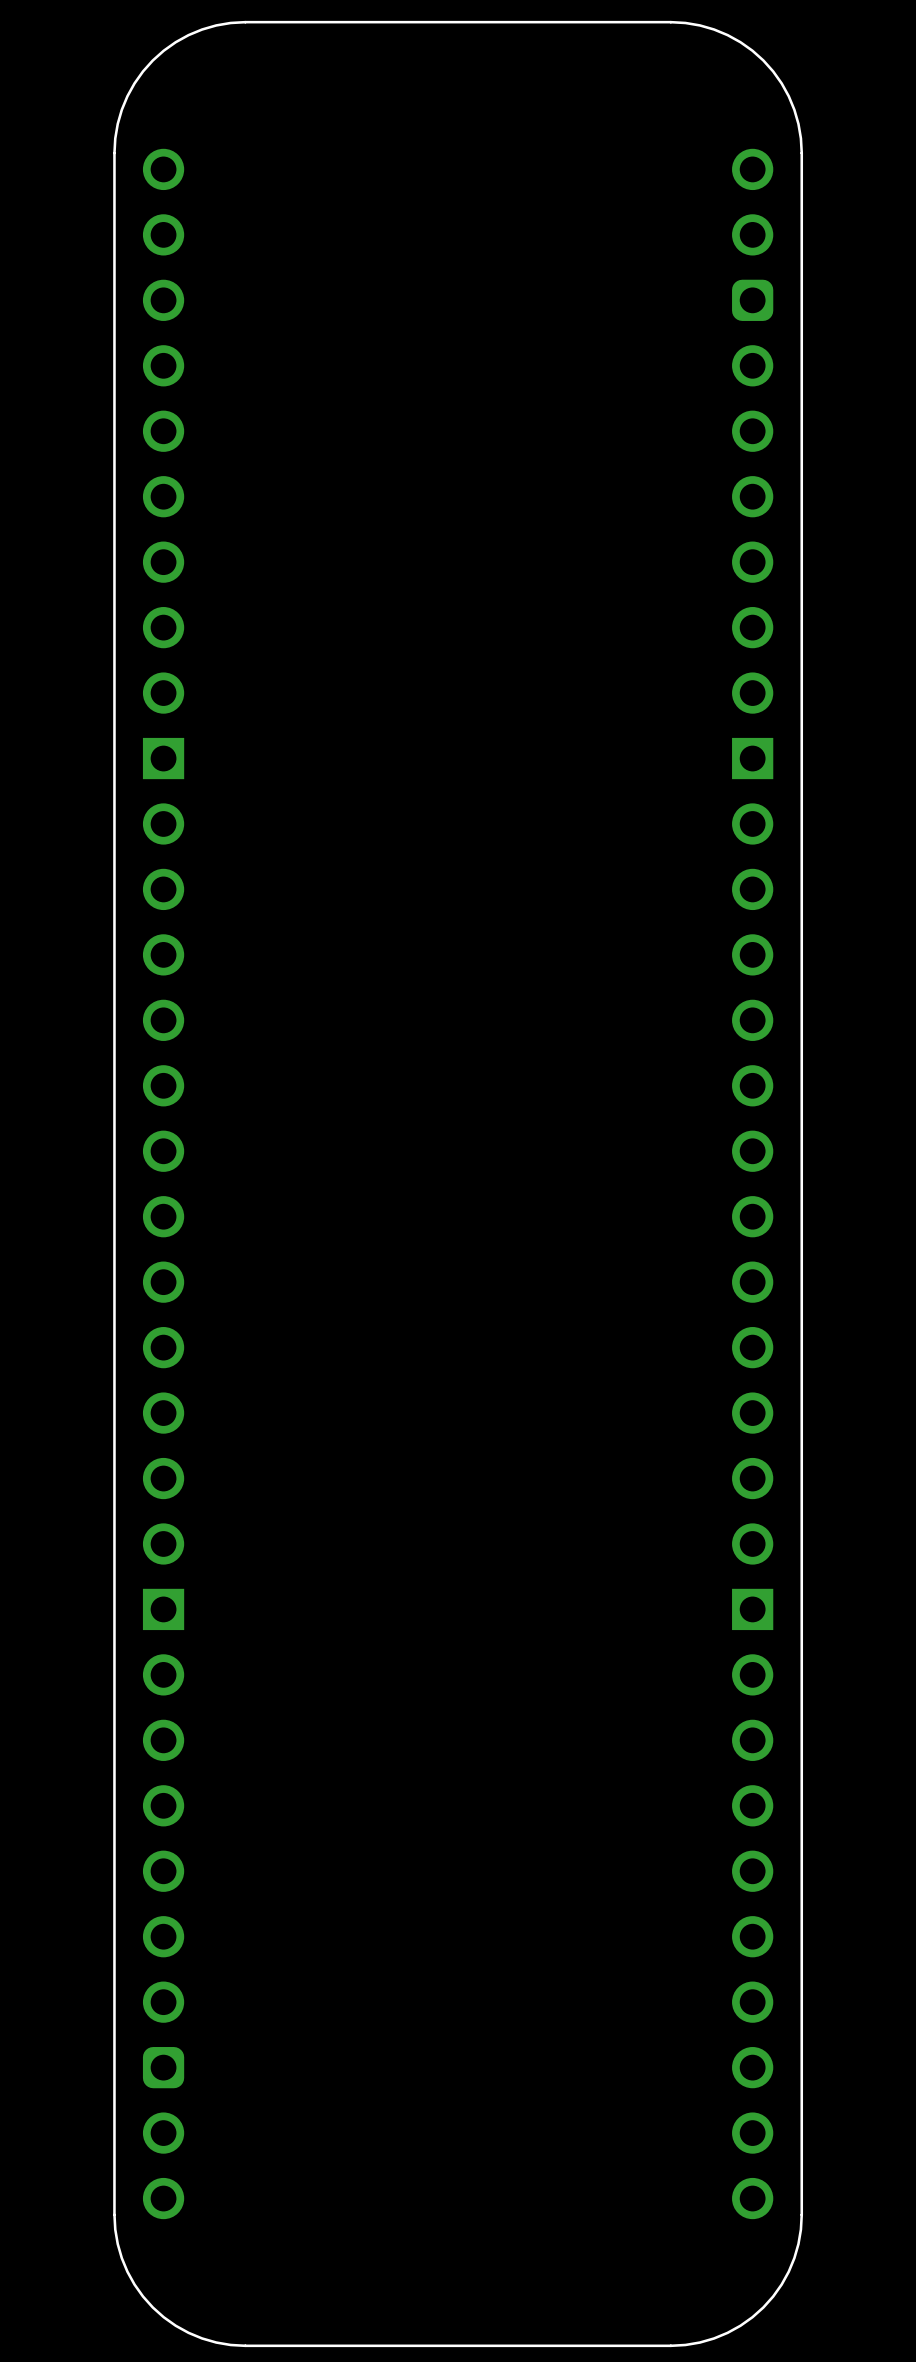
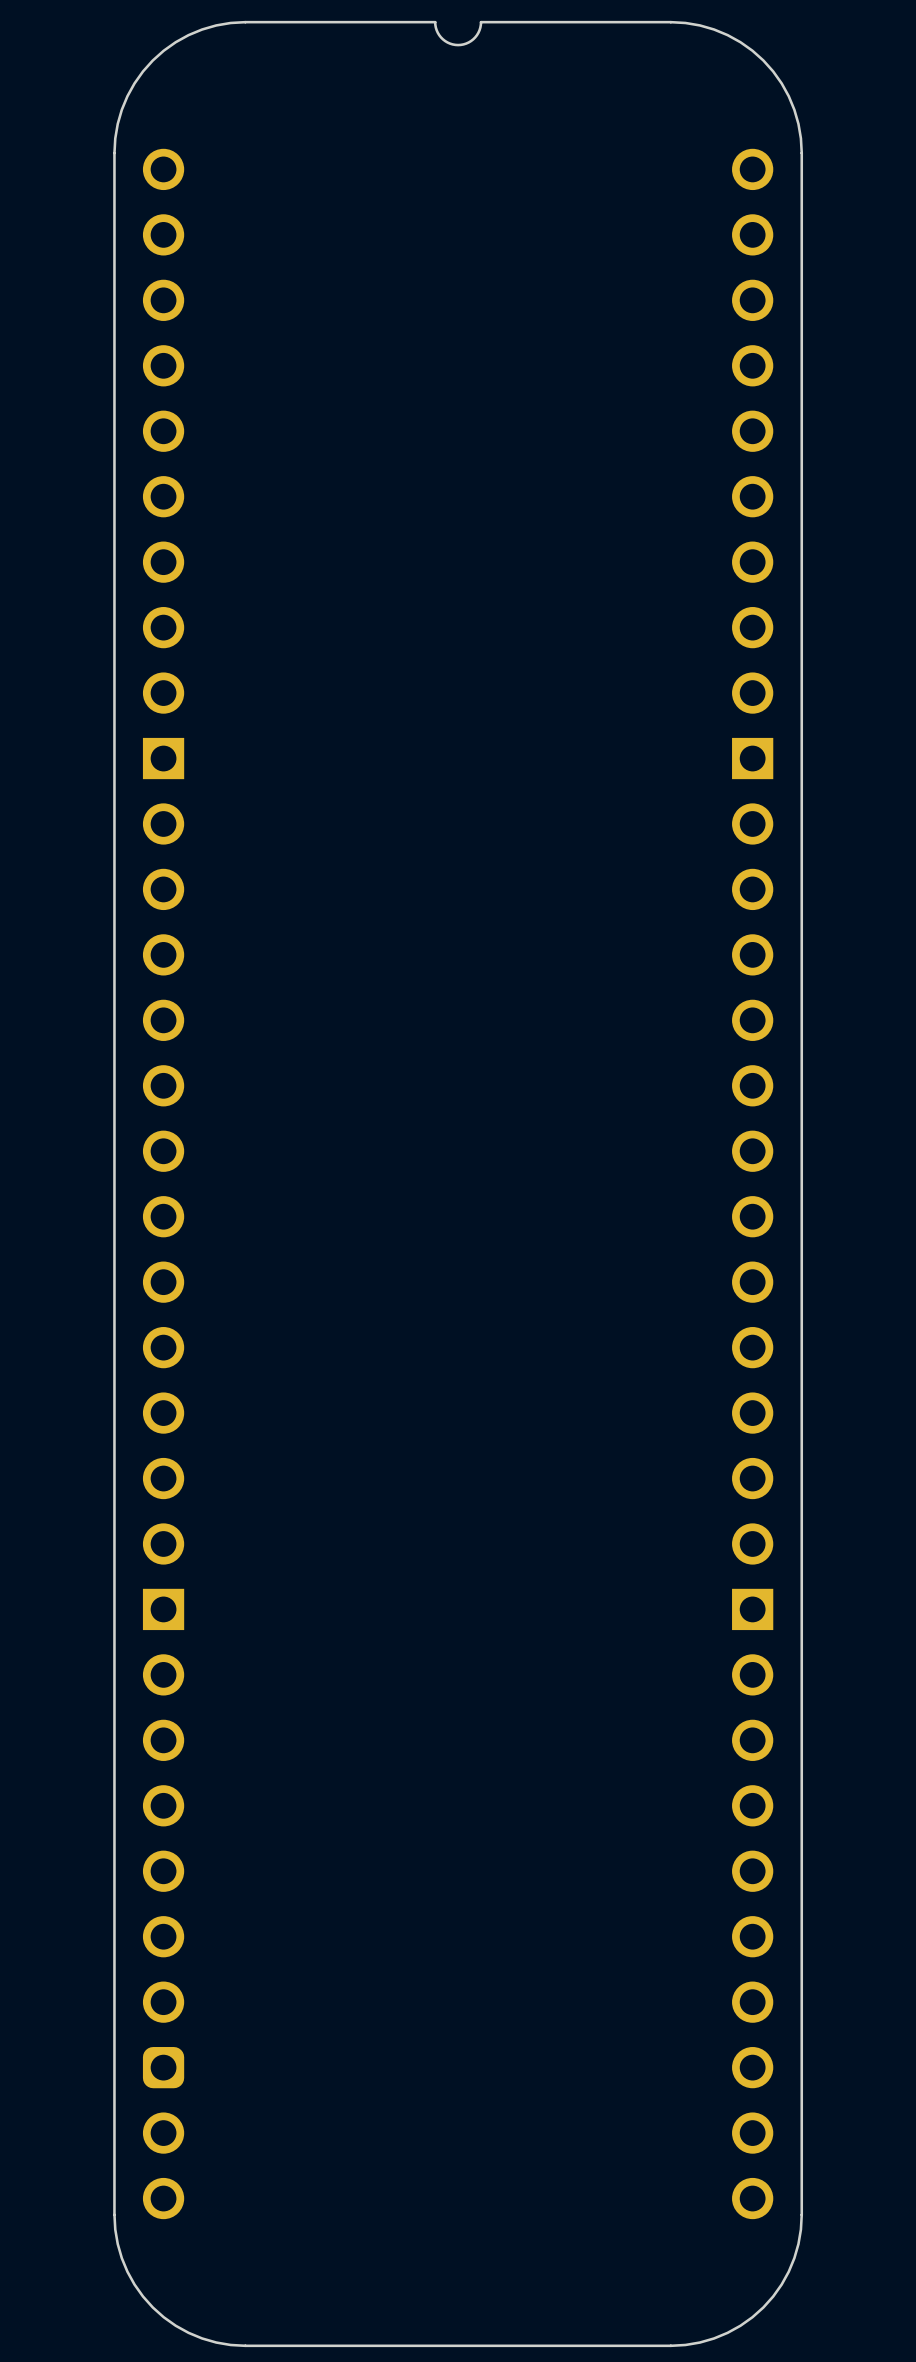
part footprint: [113, 20, 804, 2348] -> [113, 20, 804, 2348]

